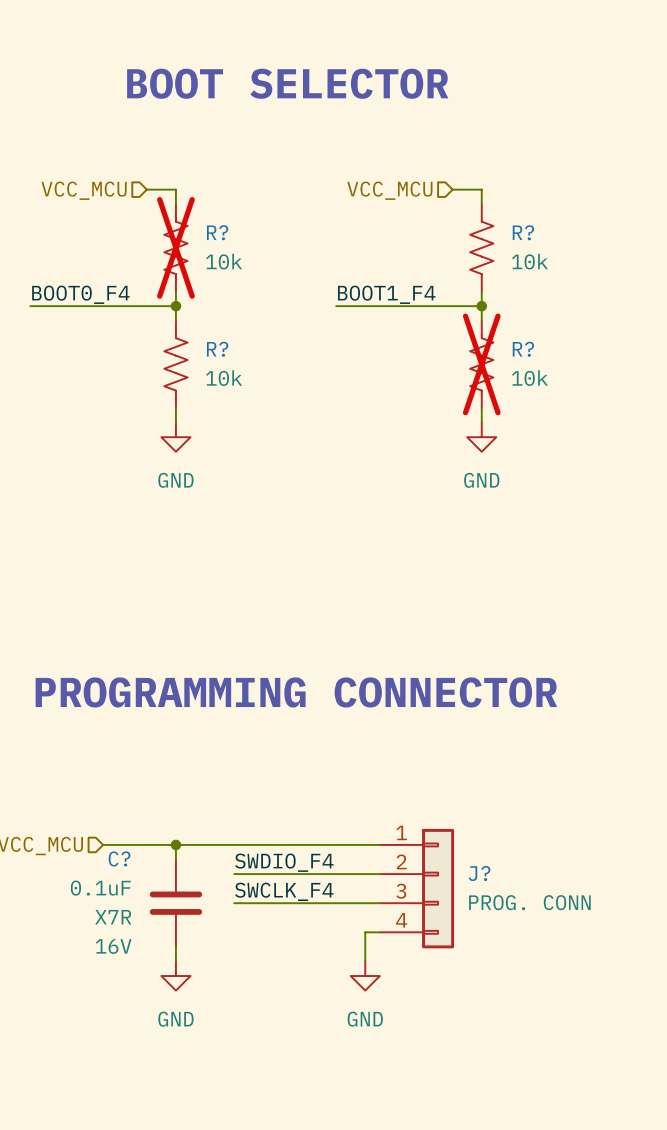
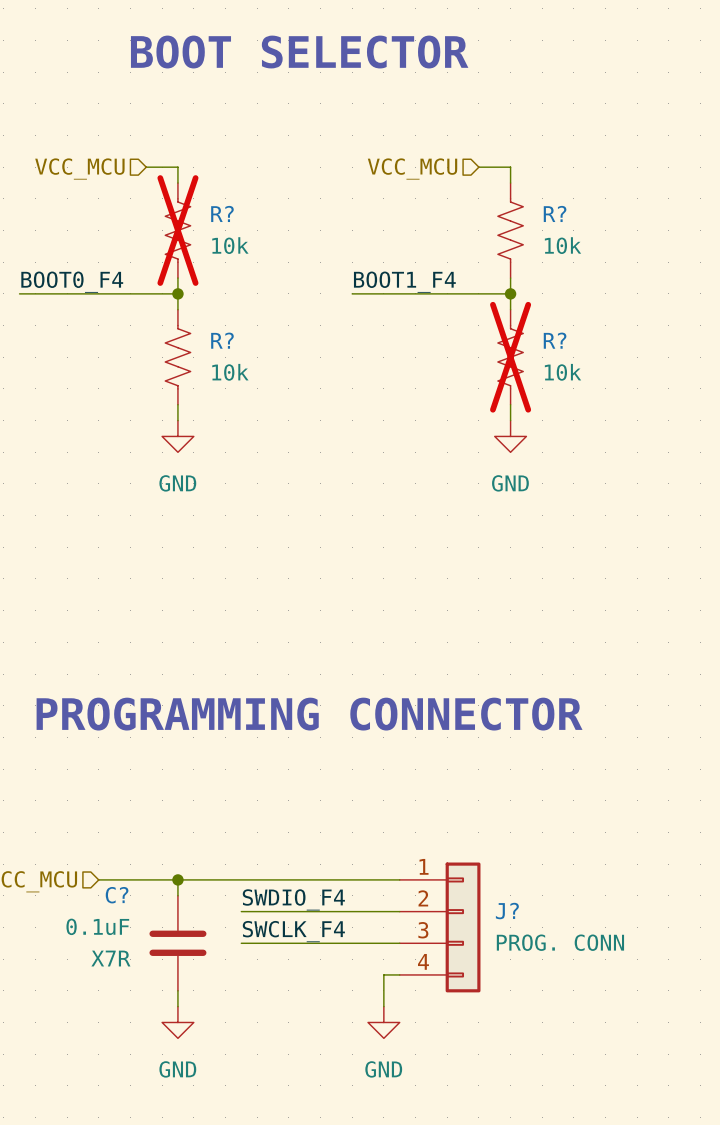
C? text: 16V (113, 946) -> none

